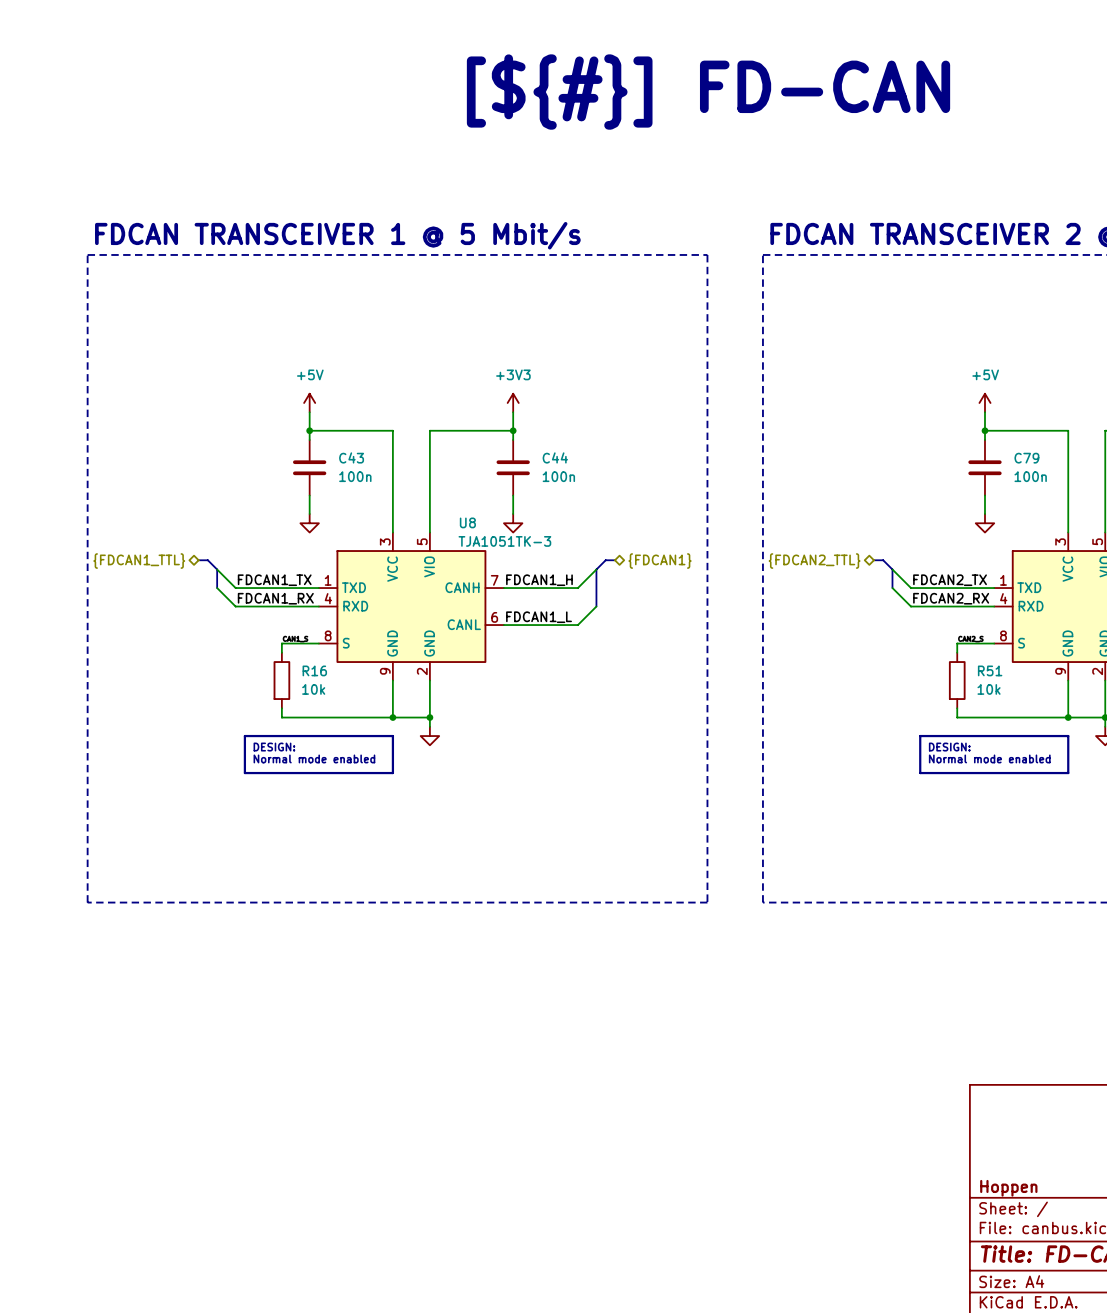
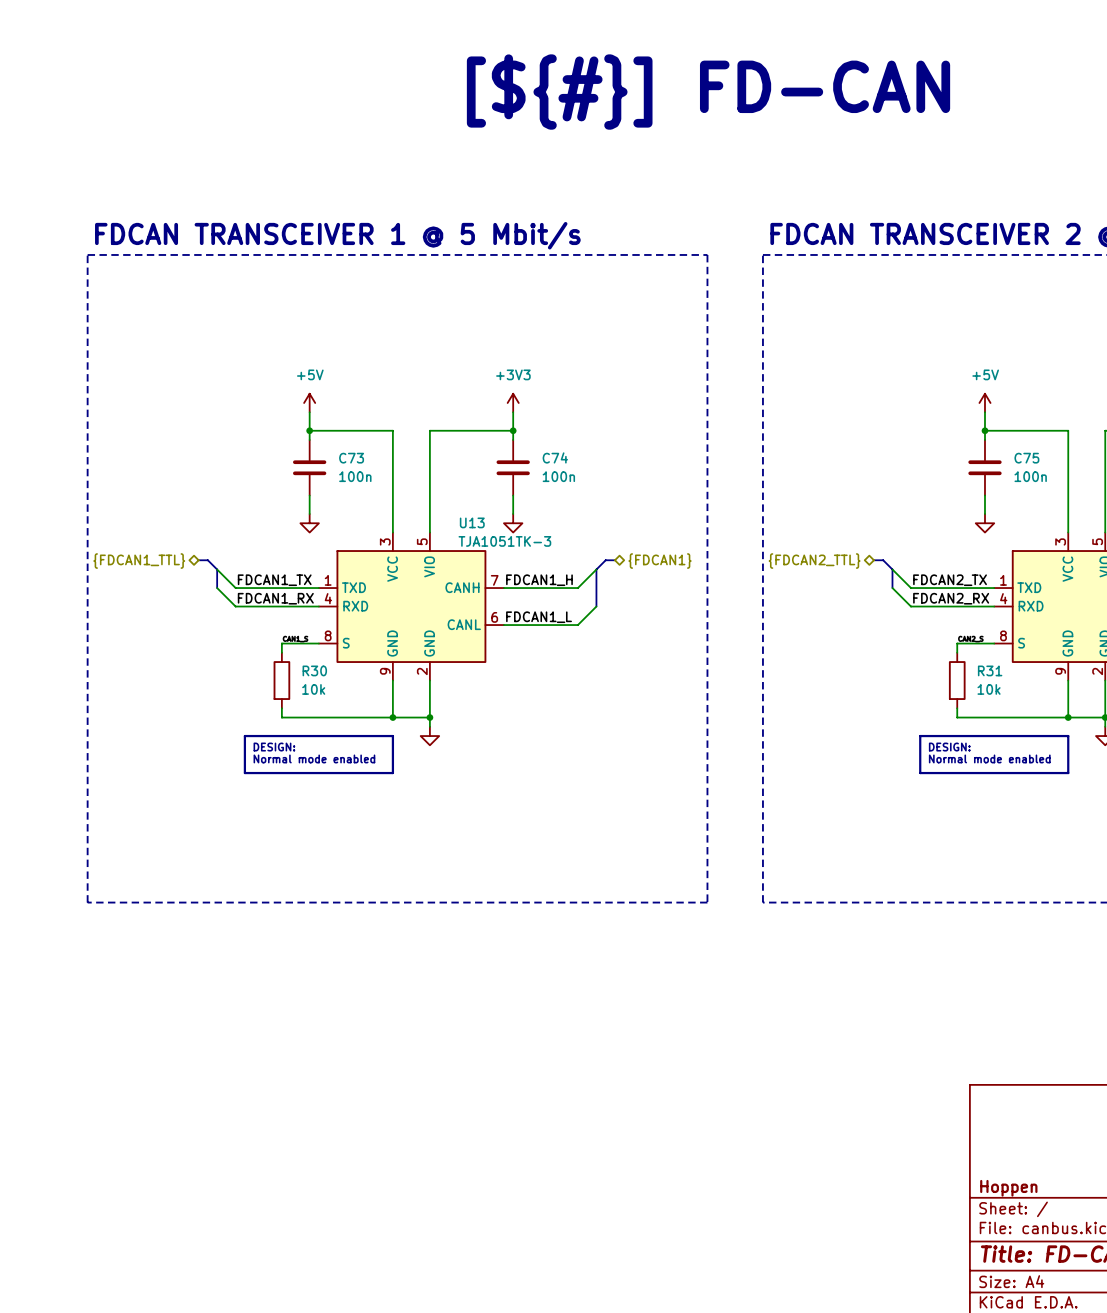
C43 name: C43 (351, 457) -> C73 (351, 458)
C44 name: C44 (555, 457) -> C74 (555, 457)
C79 name: C79 (1026, 458) -> C75 (1026, 458)
U8 name: U8 (467, 522) -> U13 (472, 522)
R16 name: R16 (314, 670) -> R30 (314, 670)
R51 name: R51 (990, 670) -> R31 (990, 670)

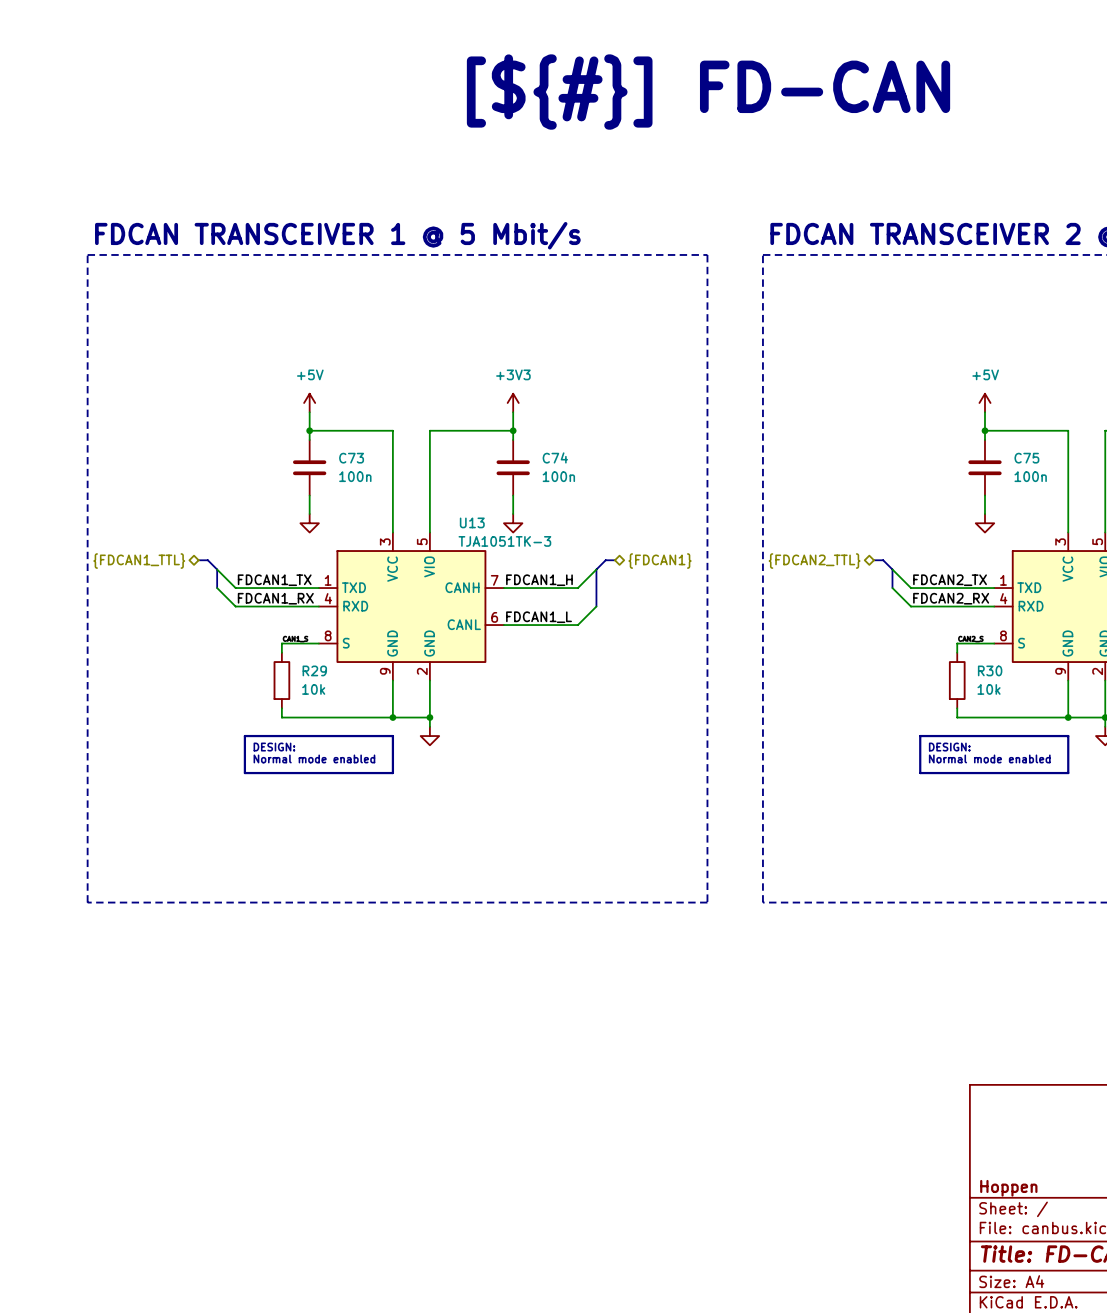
R30 name: R30 (314, 670) -> R29 (314, 670)
R31 name: R31 (990, 670) -> R30 (990, 670)

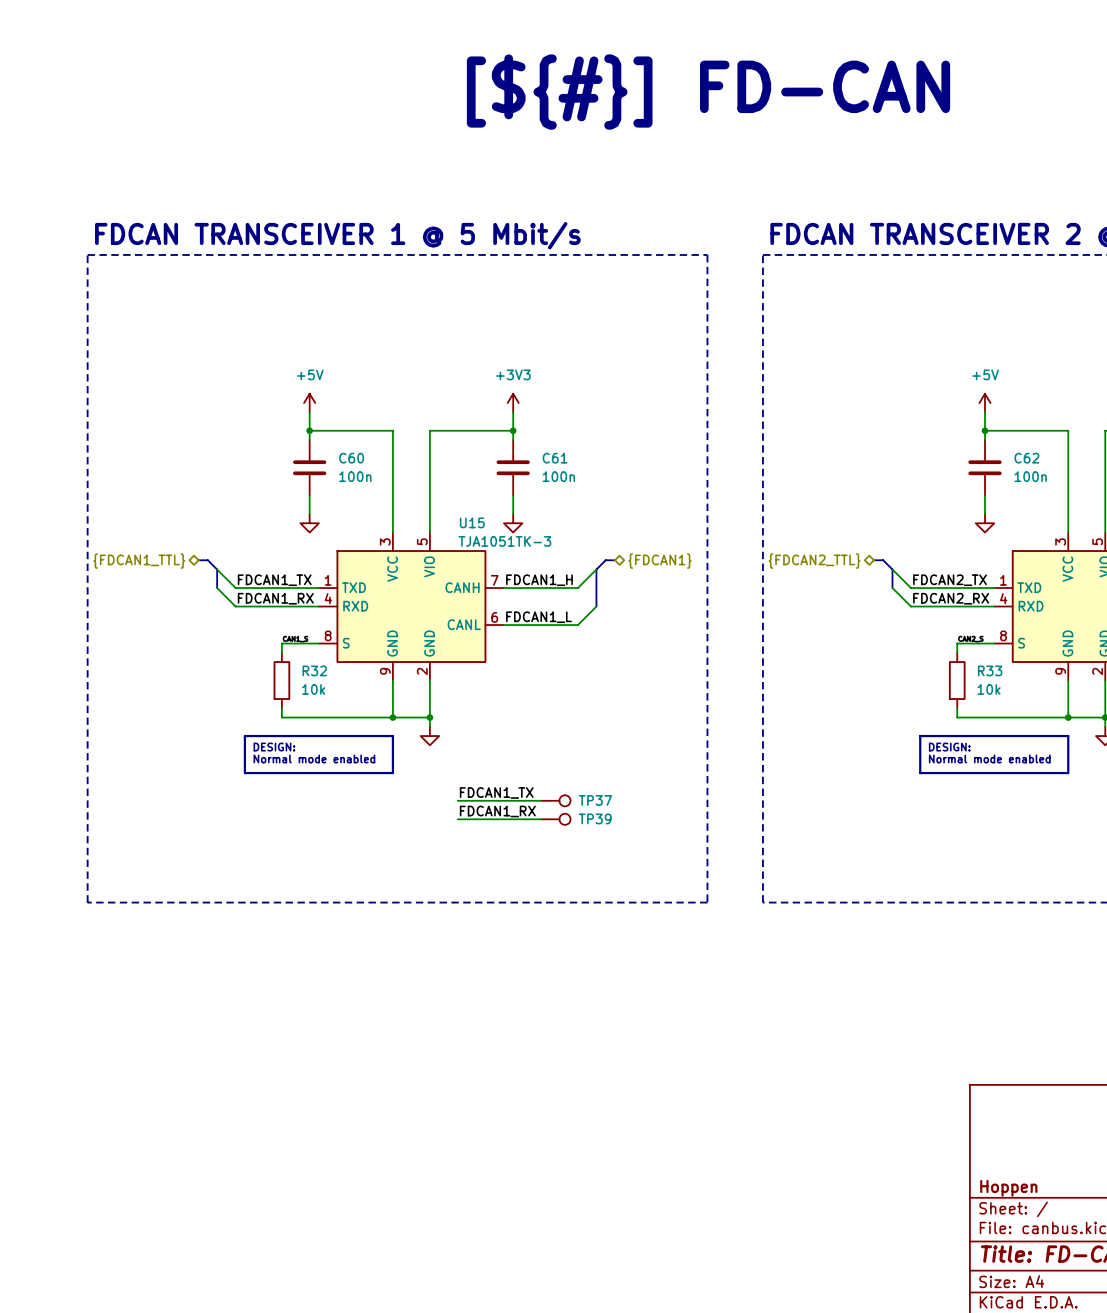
C74 name: C74 (555, 457) -> C61 (555, 458)
C73 name: C73 (351, 458) -> C60 (351, 458)
C75 name: C75 (1026, 458) -> C62 (1026, 458)
U13 name: U13 (472, 522) -> U15 (472, 522)
R29 name: R29 (314, 670) -> R32 (314, 670)
R30 name: R30 (990, 670) -> R33 (990, 670)
label: none -> FDCAN1_TX (496, 792)
wire: none -> (457, 800) (540, 800)
TP37: none -> (555, 800)
label: none -> FDCAN1_RX (497, 811)
wire: none -> (457, 819) (540, 819)
TP39: none -> (555, 819)

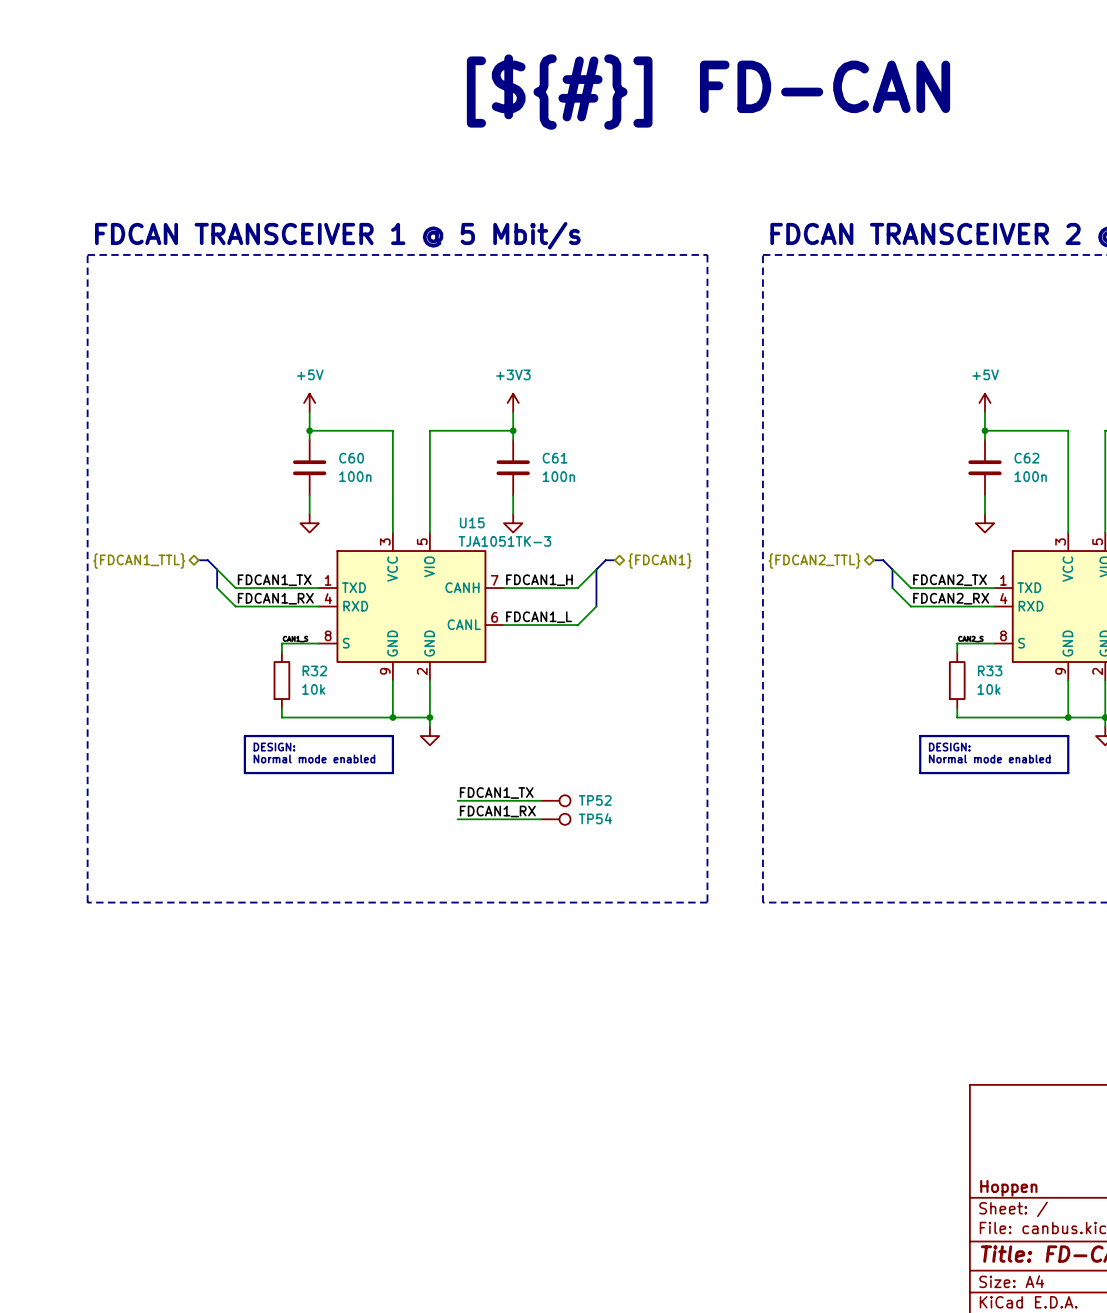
TP37 name: TP37 (595, 800) -> TP52 (595, 800)
TP39 name: TP39 (595, 818) -> TP54 (595, 818)

